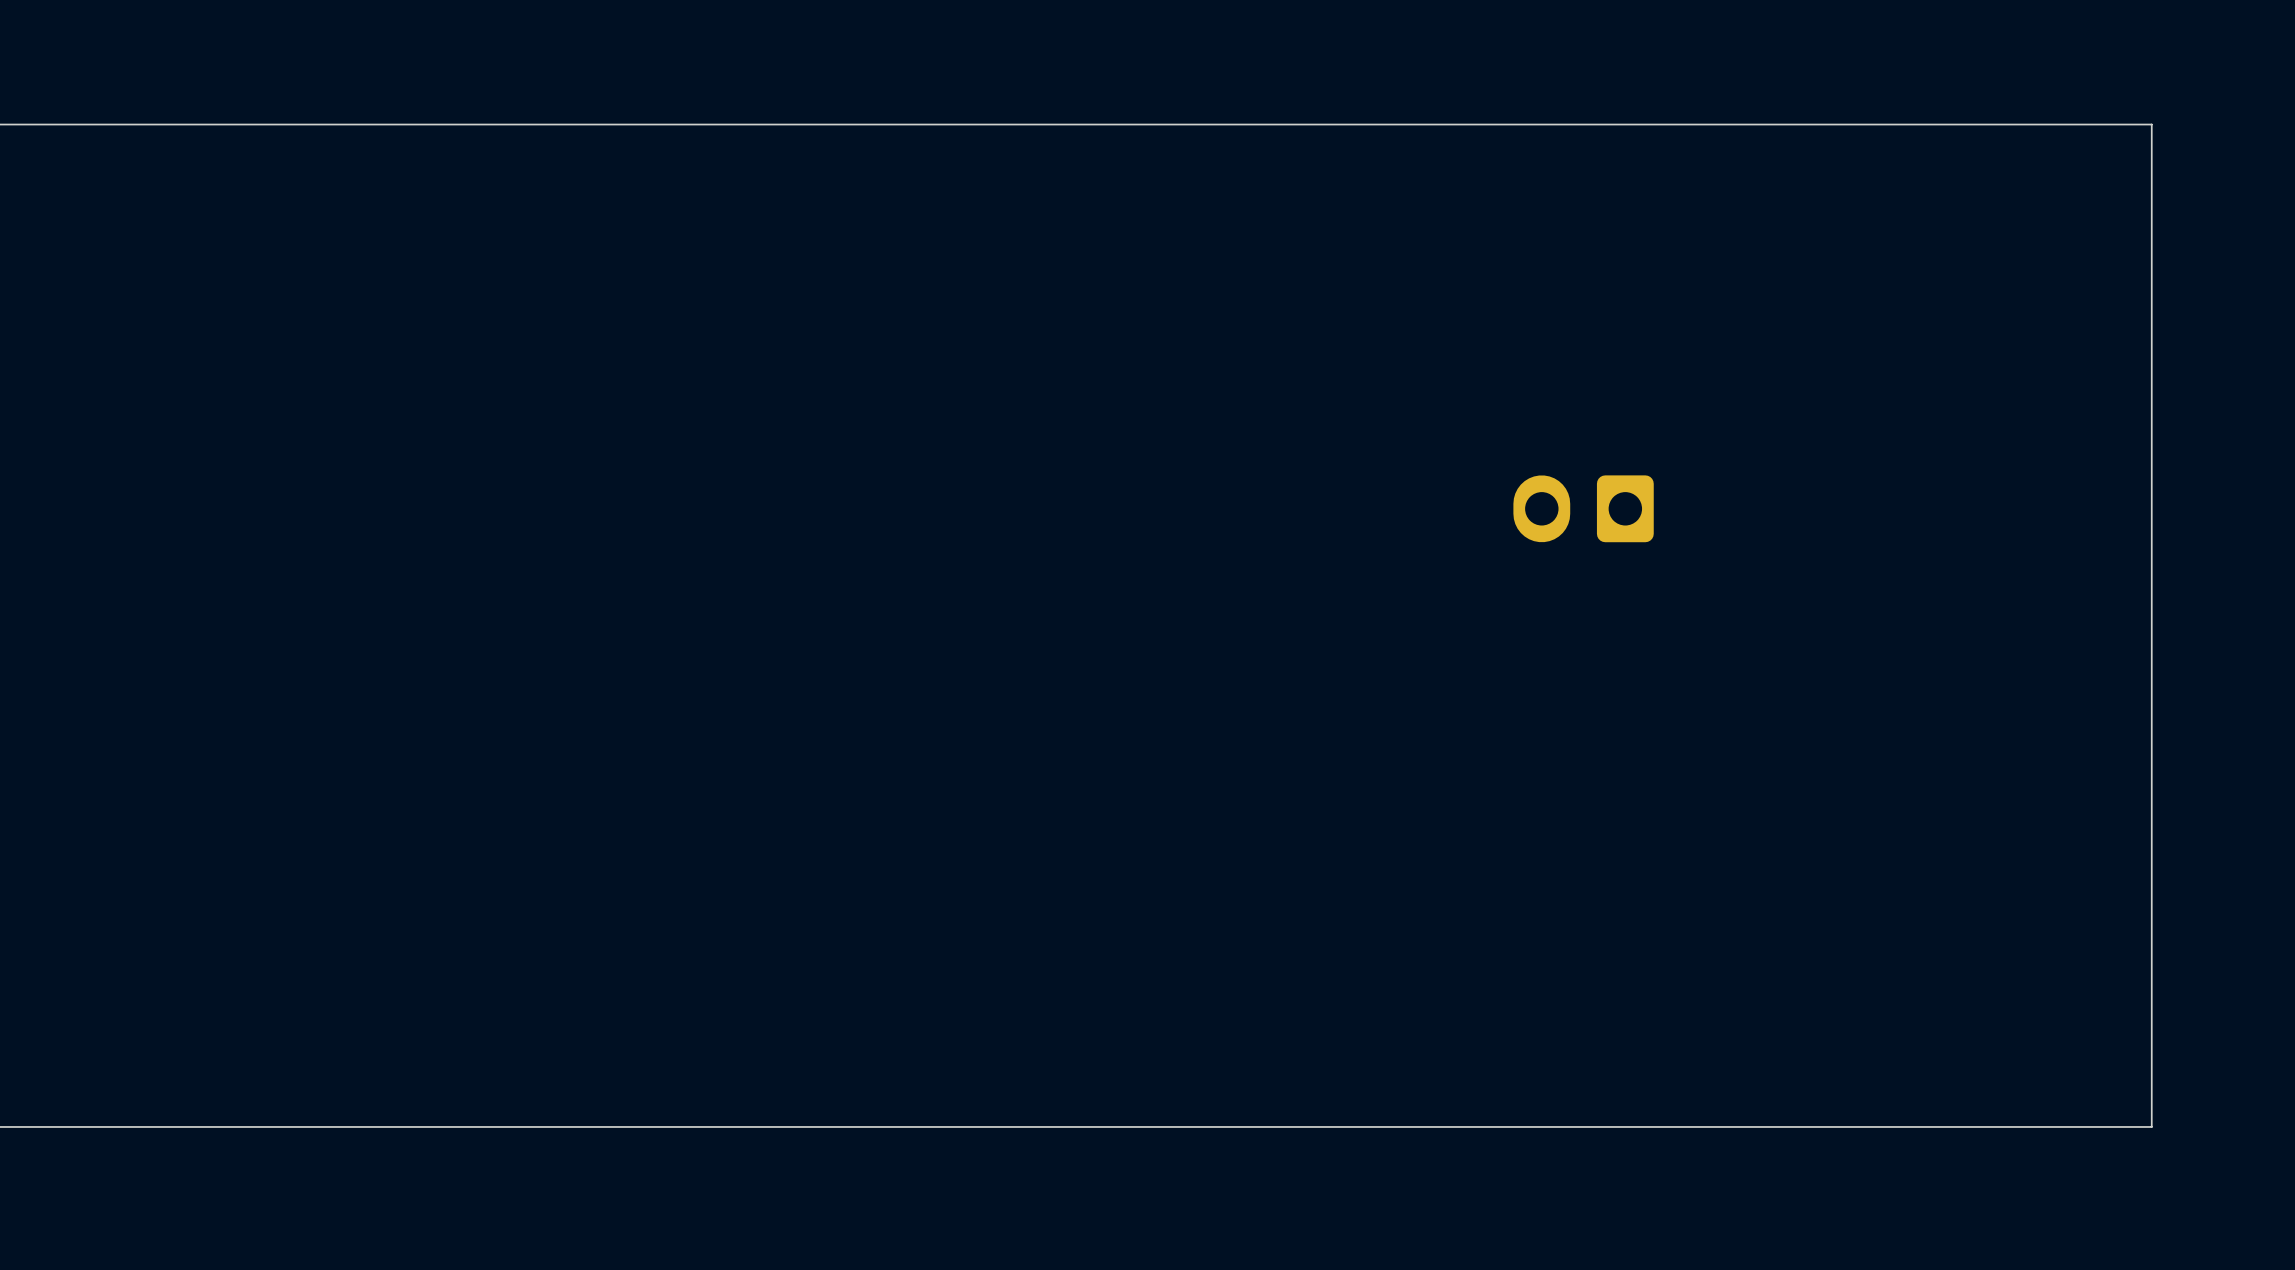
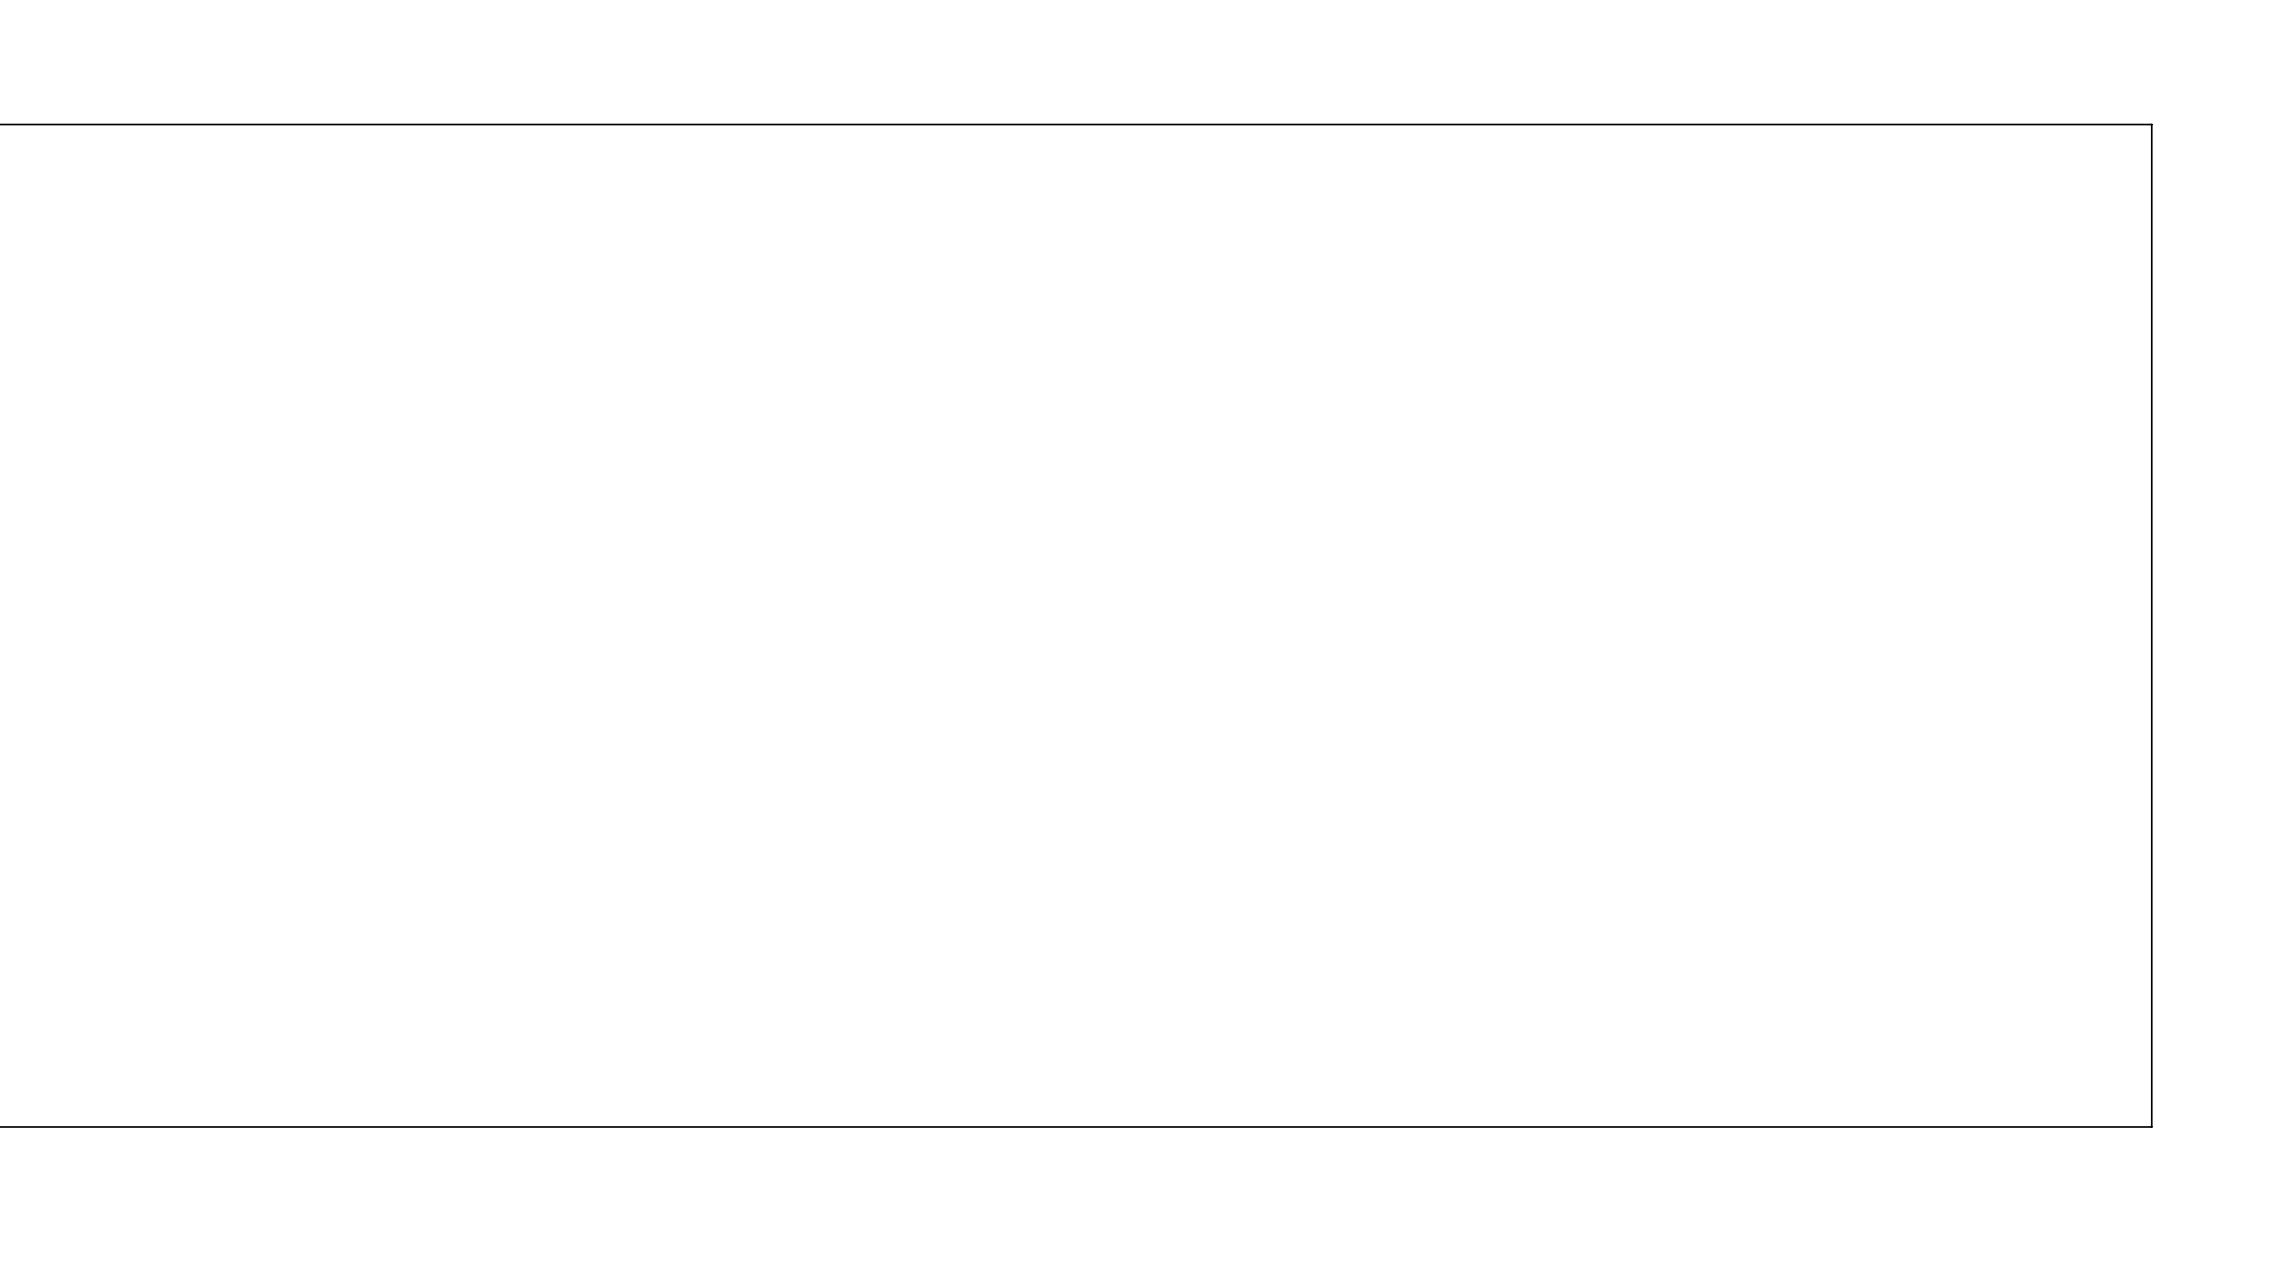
part: (1583, 508) -> none

